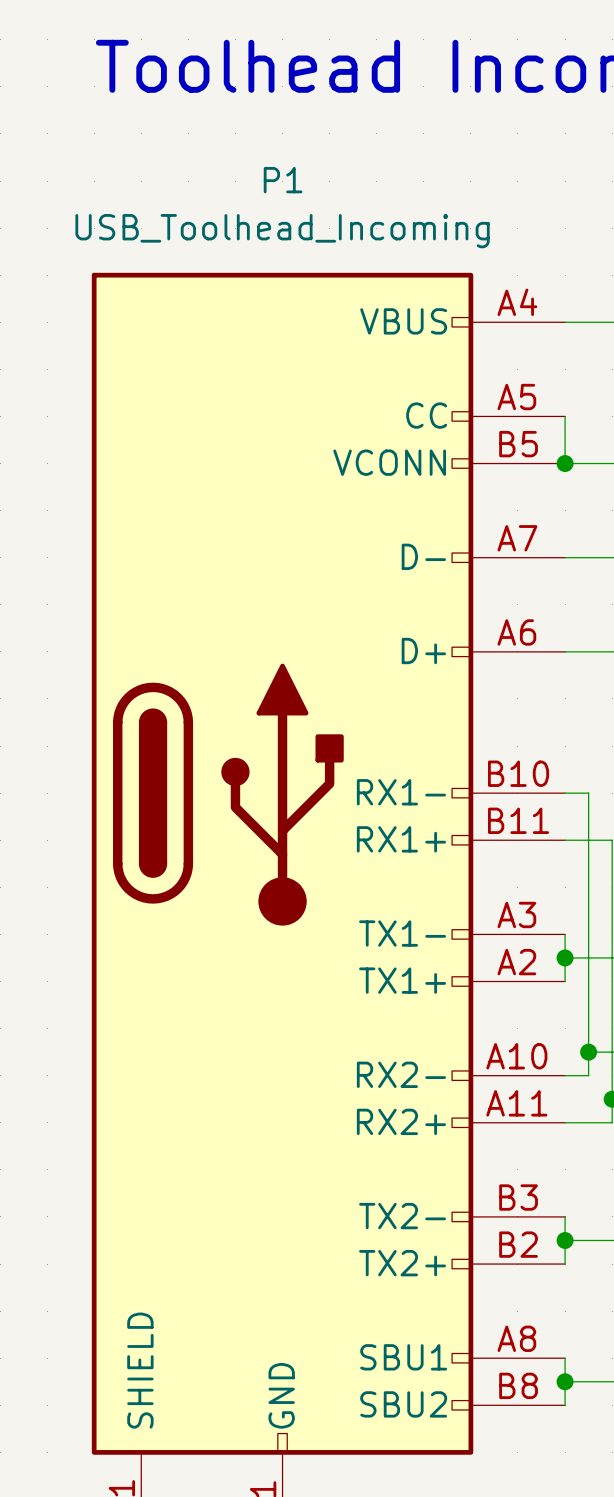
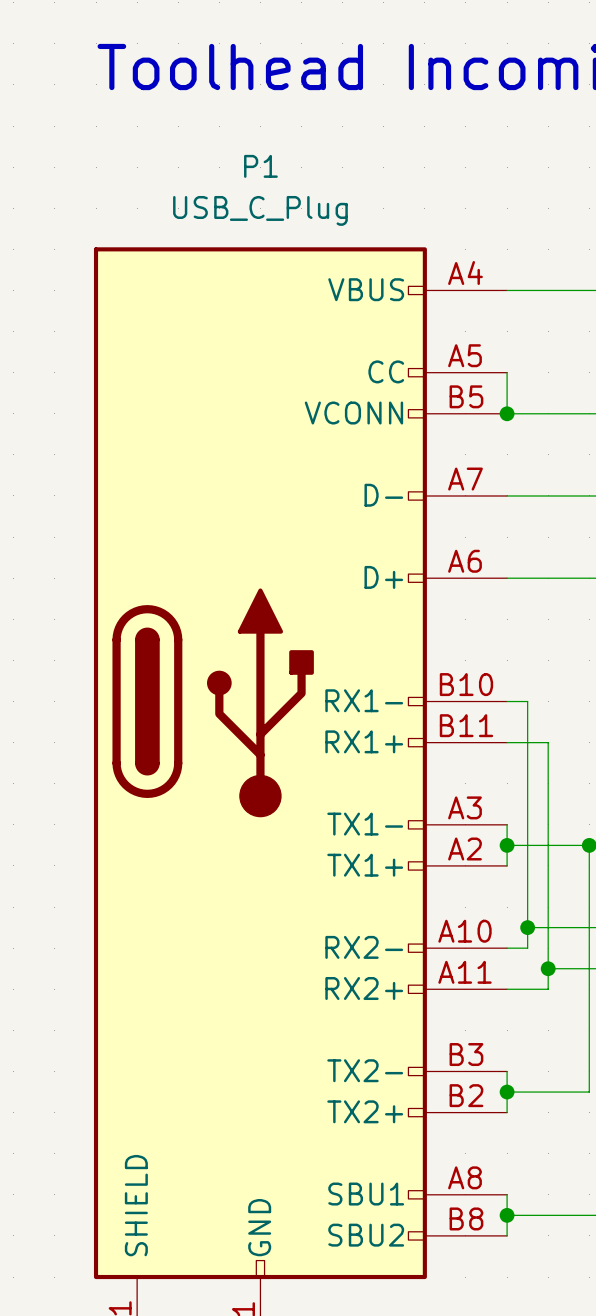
P1 value: USB_Toolhead_Incoming (282, 231) -> USB_C_Plug (260, 210)

